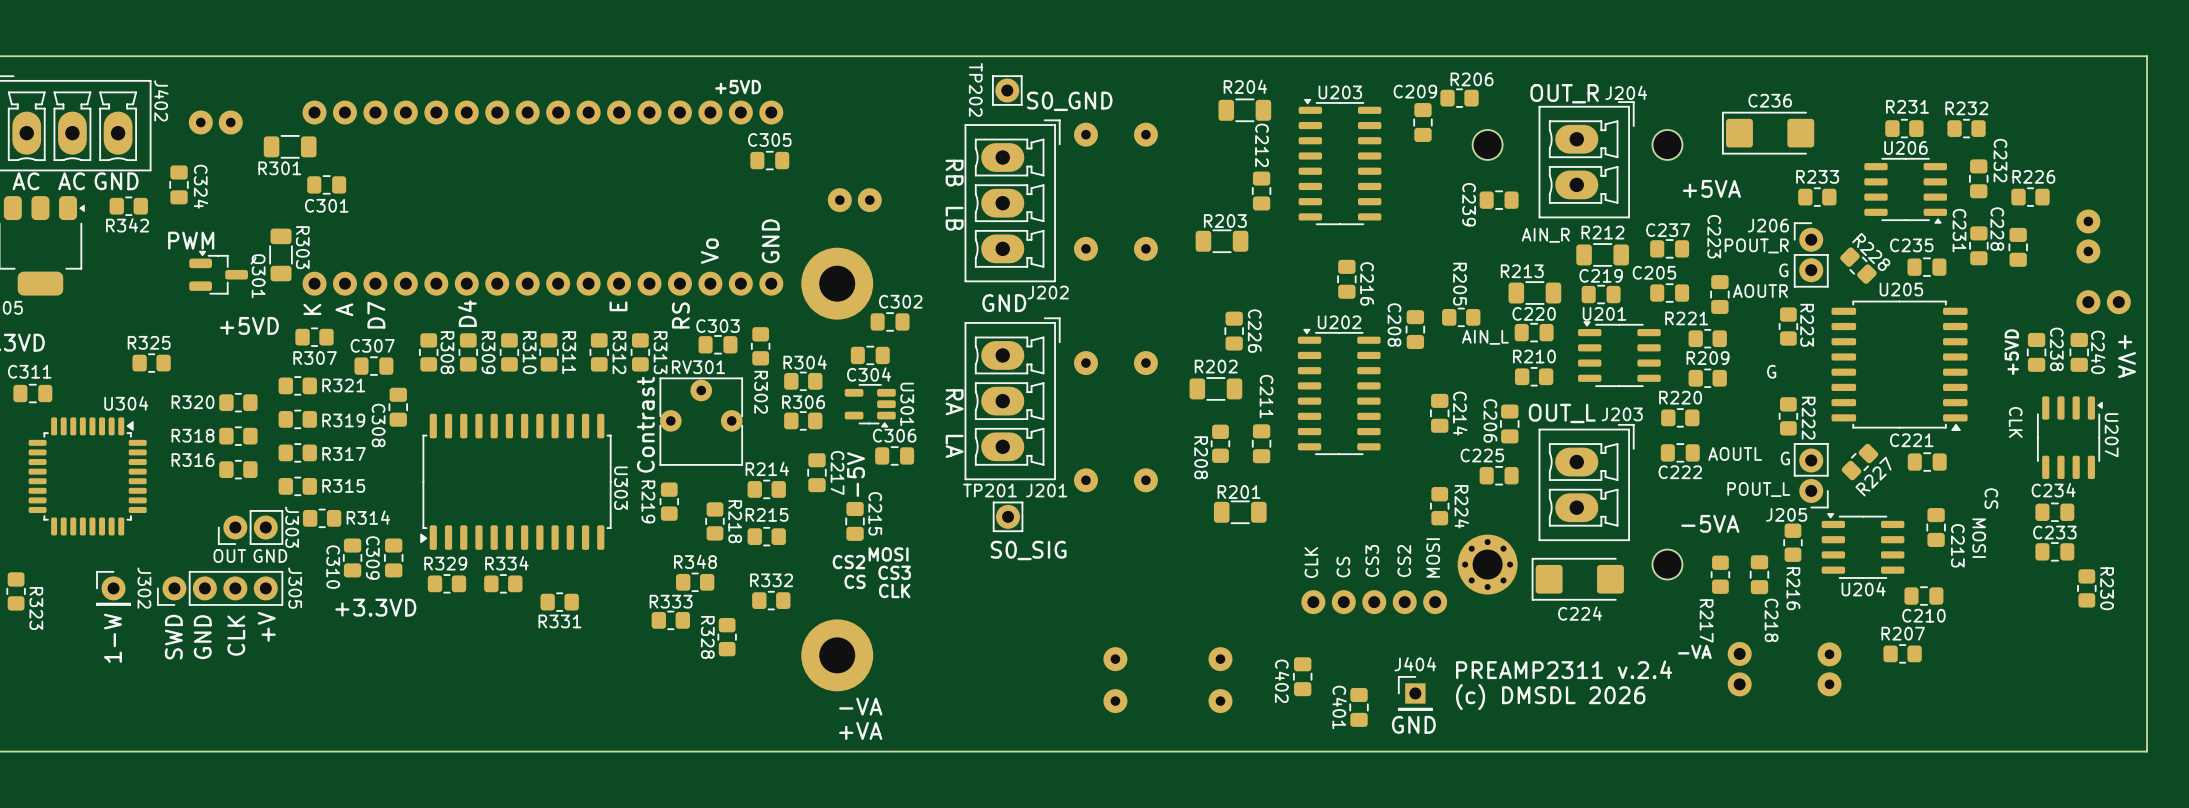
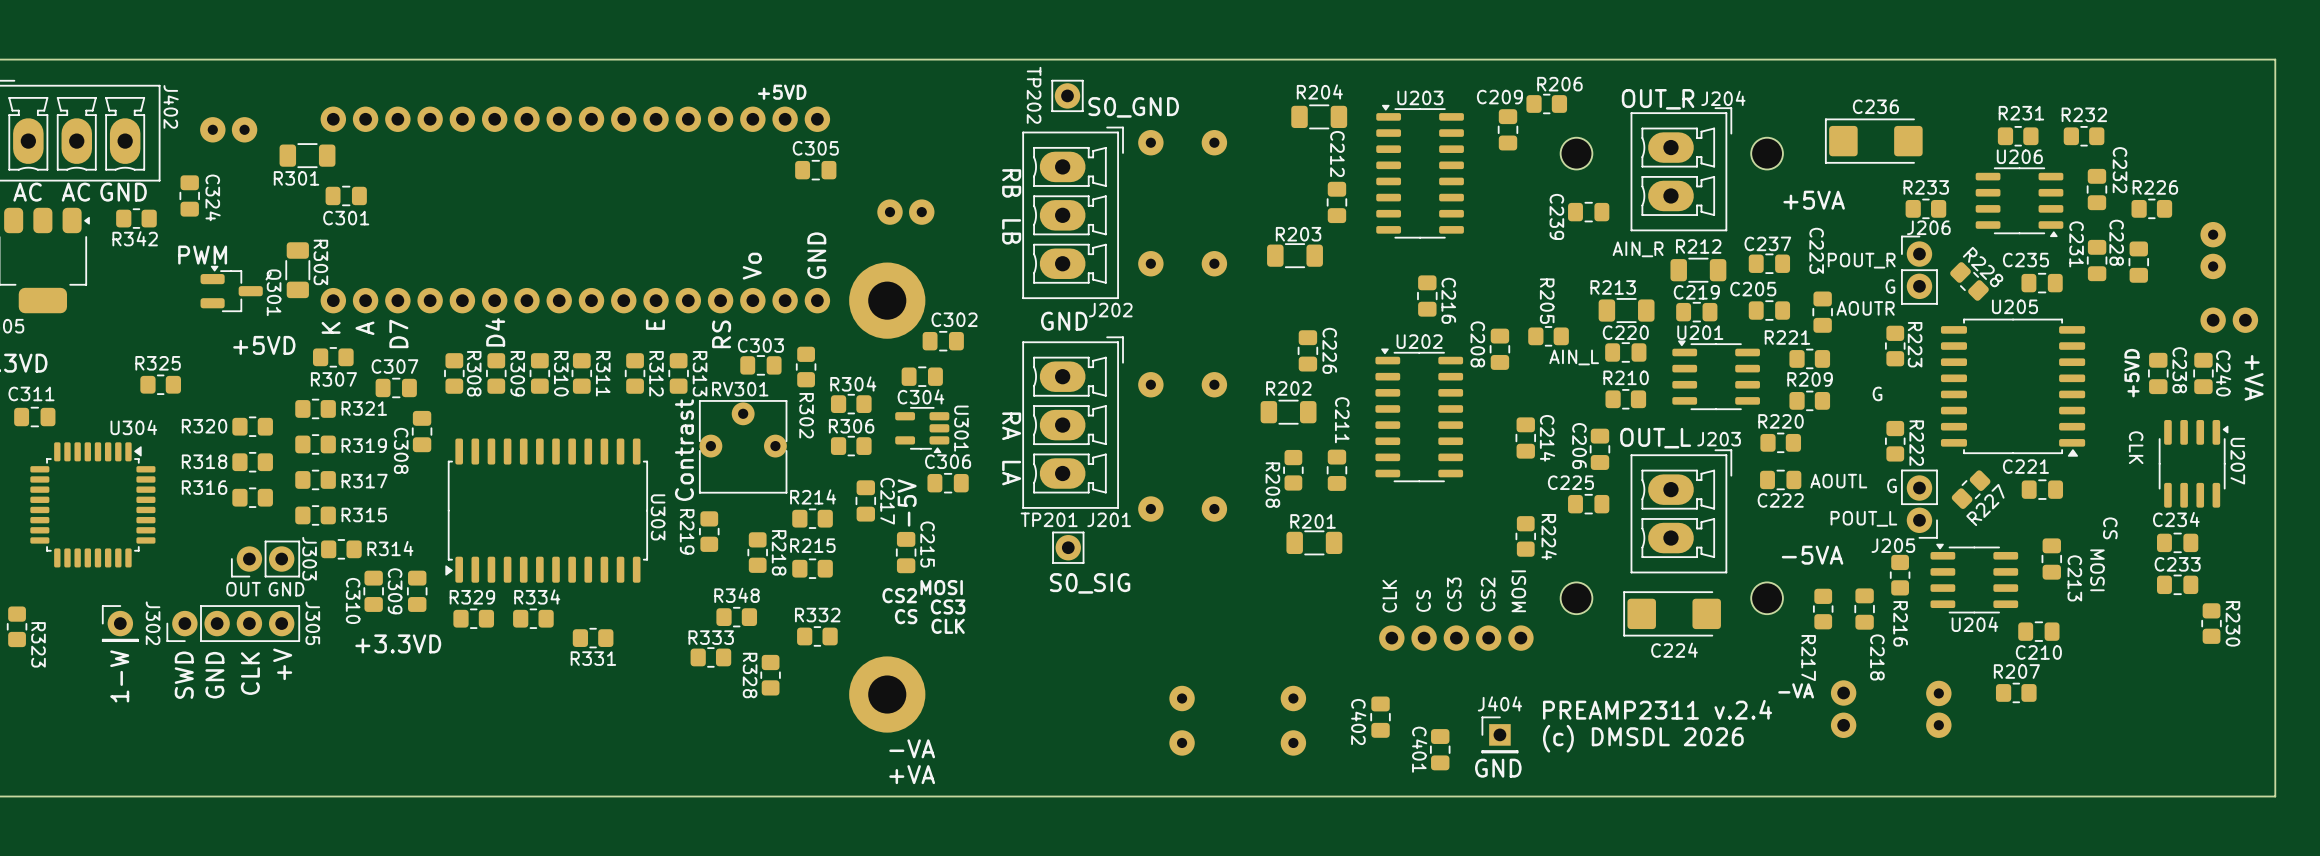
J206 name position: J206 (1768, 225) -> J206 (1928, 227)
part footprint: [1457, 534, 1518, 595] -> [1560, 582, 1593, 615]

